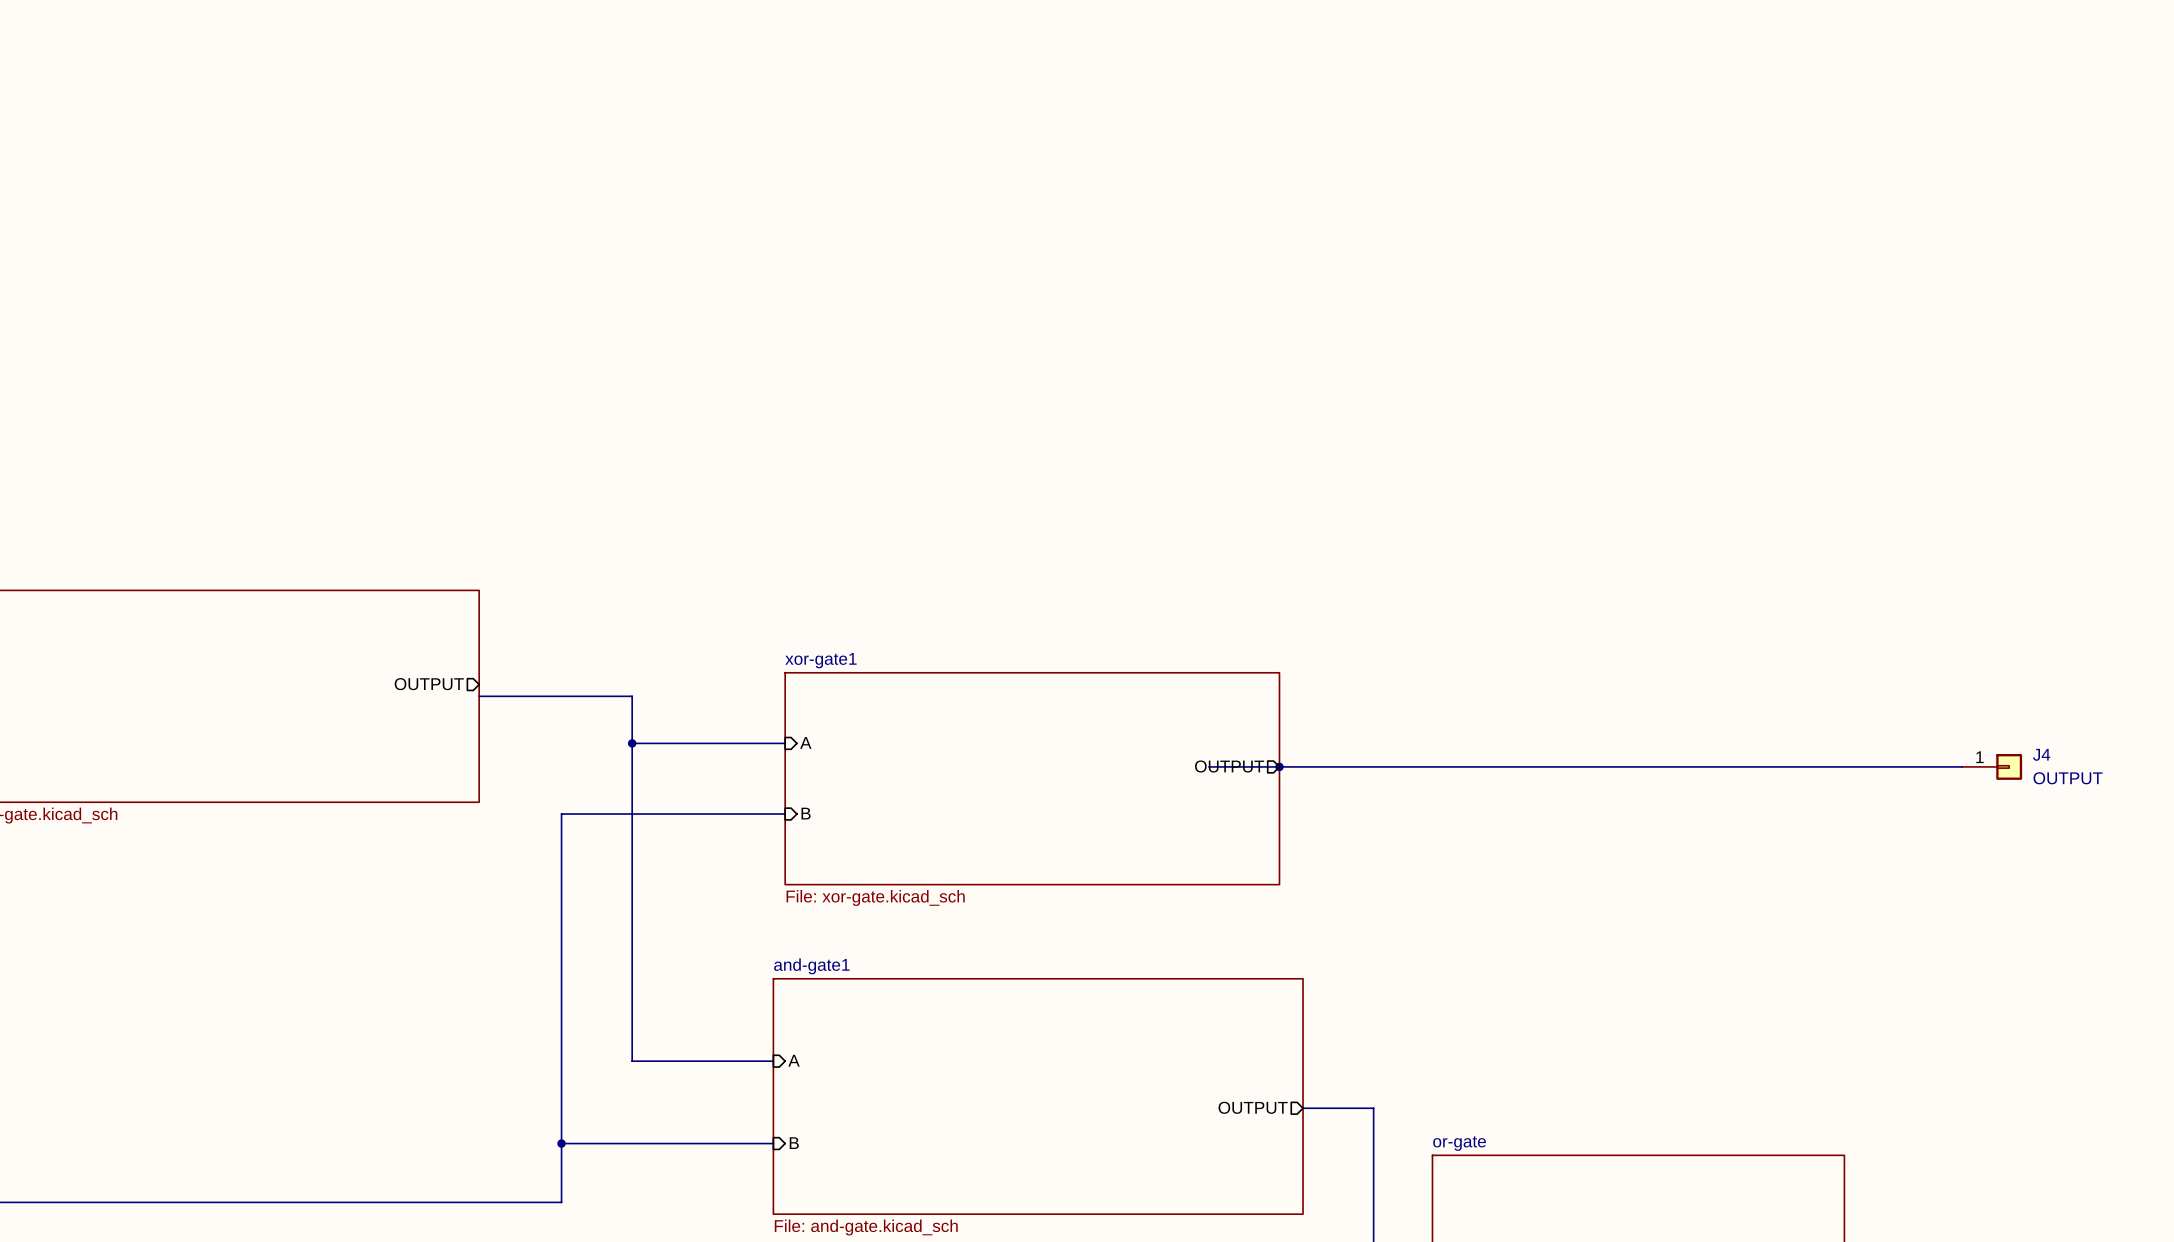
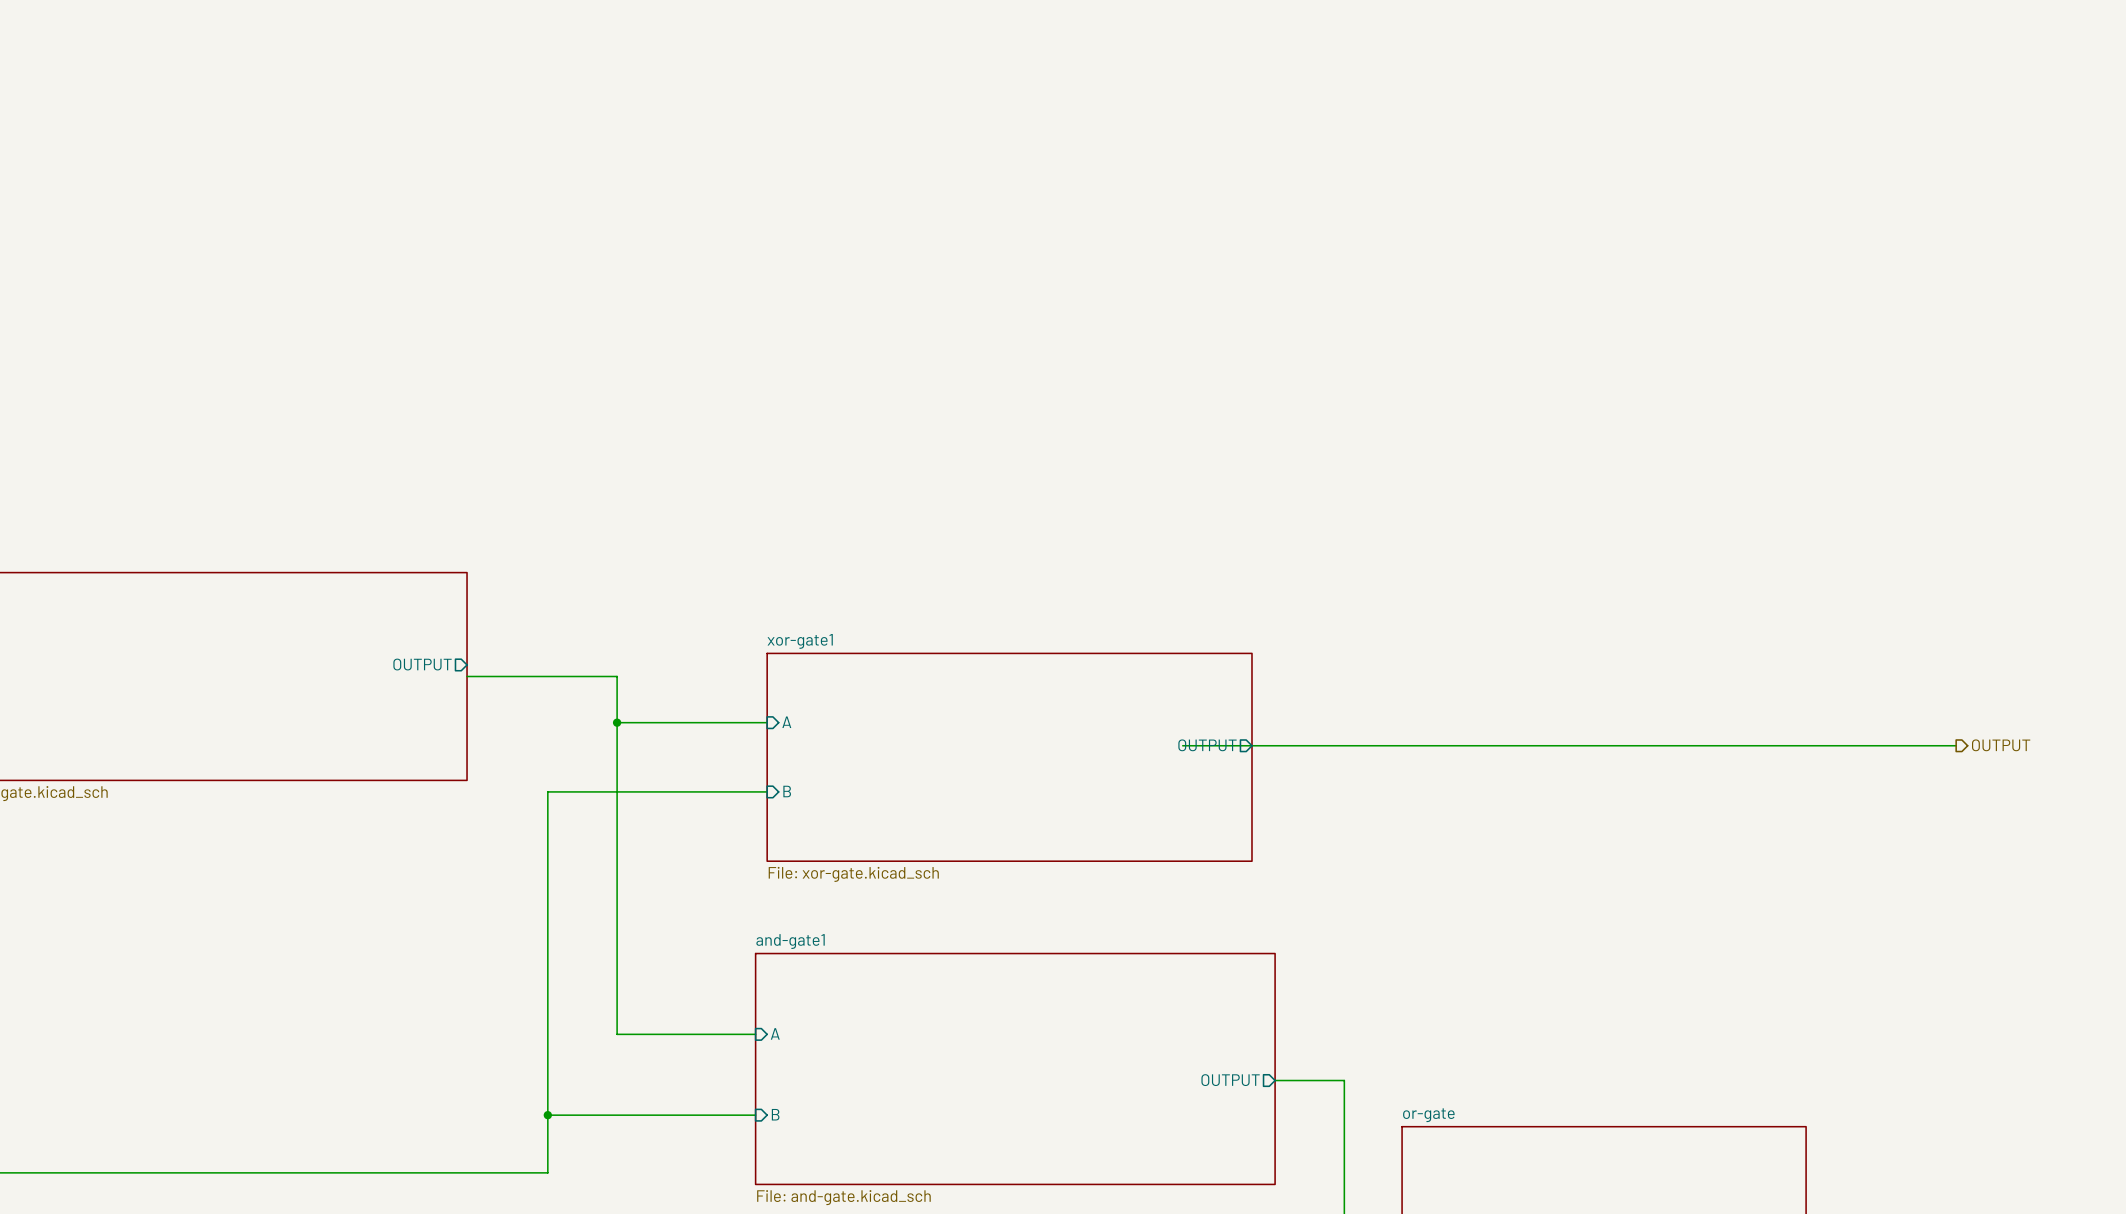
junction: (1279, 766) -> none
J4: OUTPUT (1992, 766) -> none
hierarchical label: none -> OUTPUT (2001, 745)

